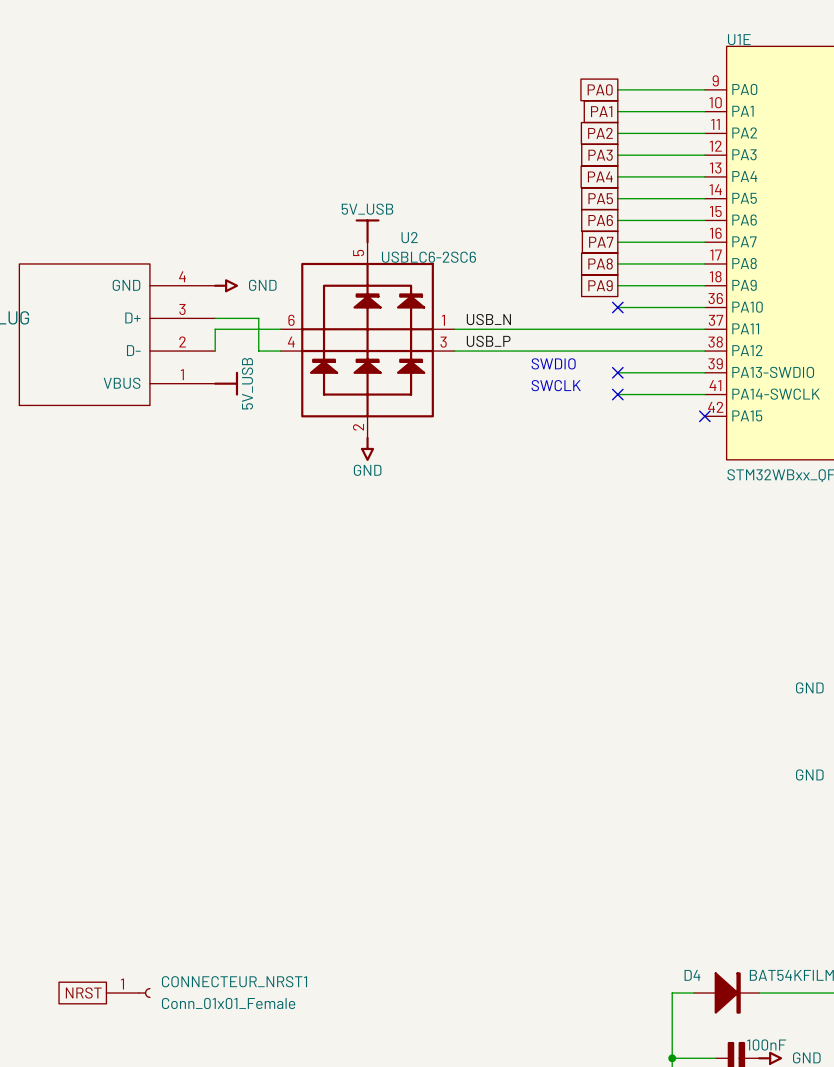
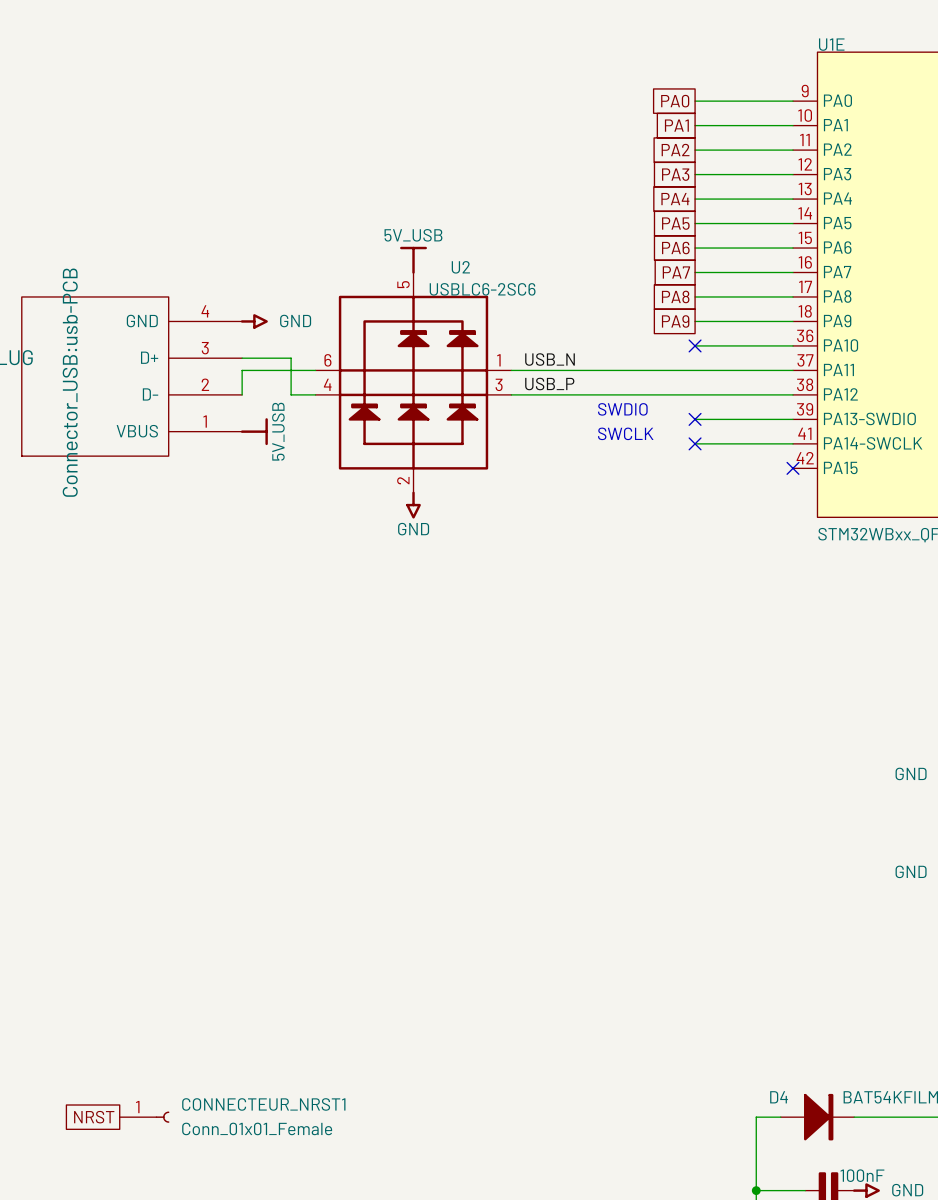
part text: none -> Connector_USB:usb-PCB (70, 382)

